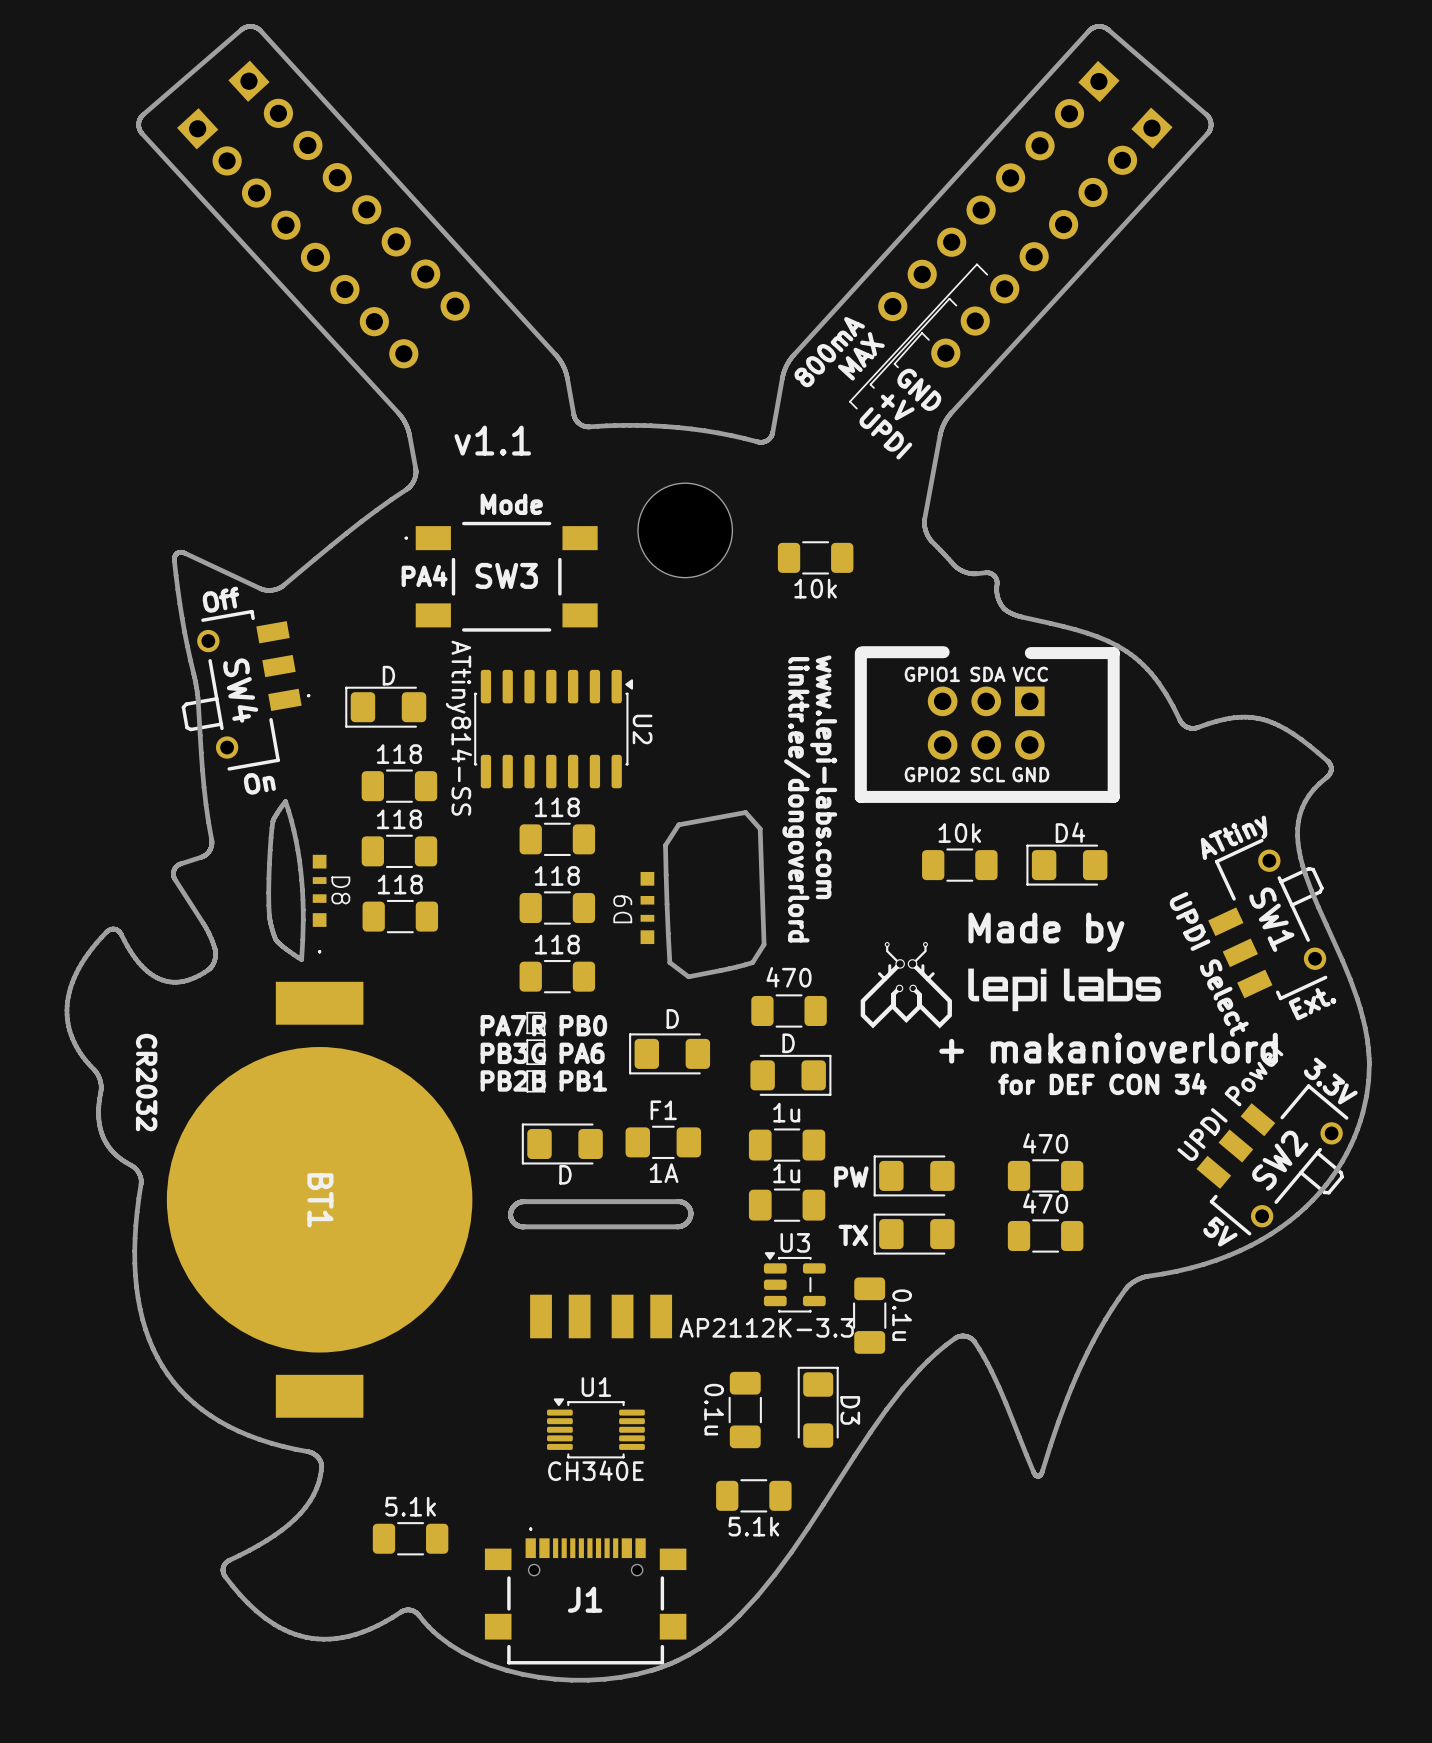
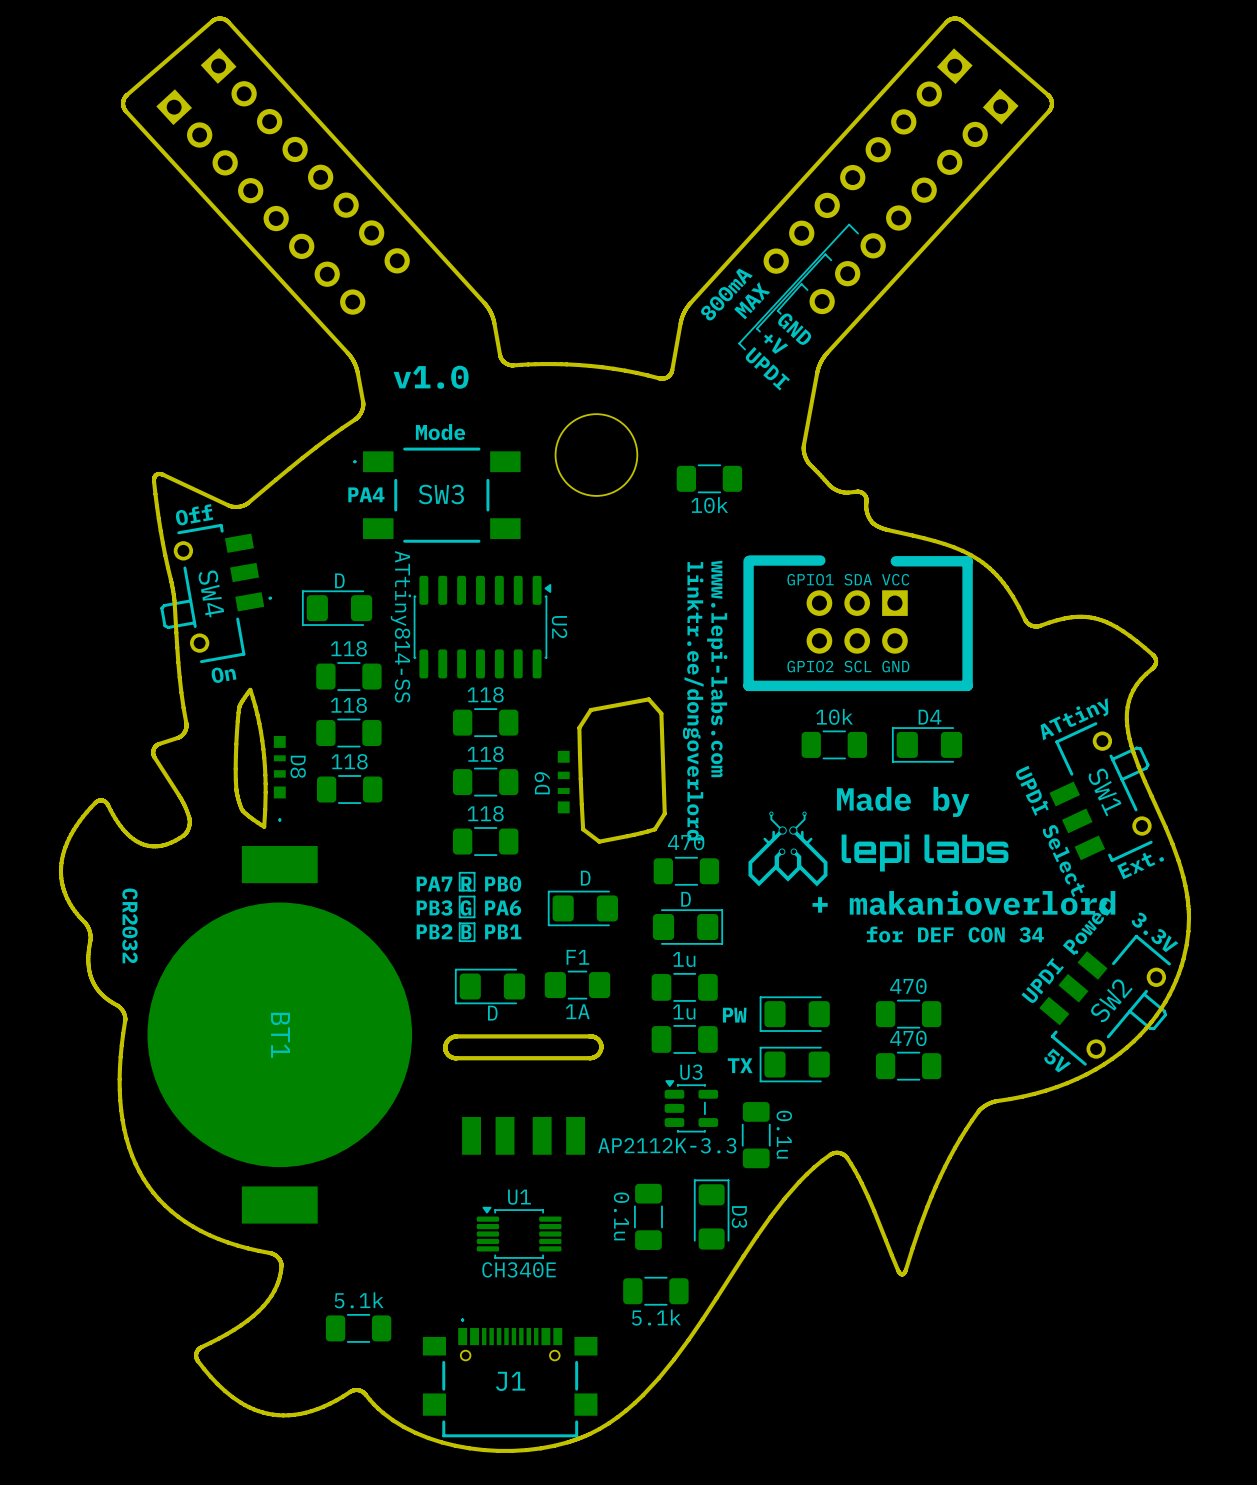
text: v1.1 (492, 440) -> v1.0 (431, 377)

